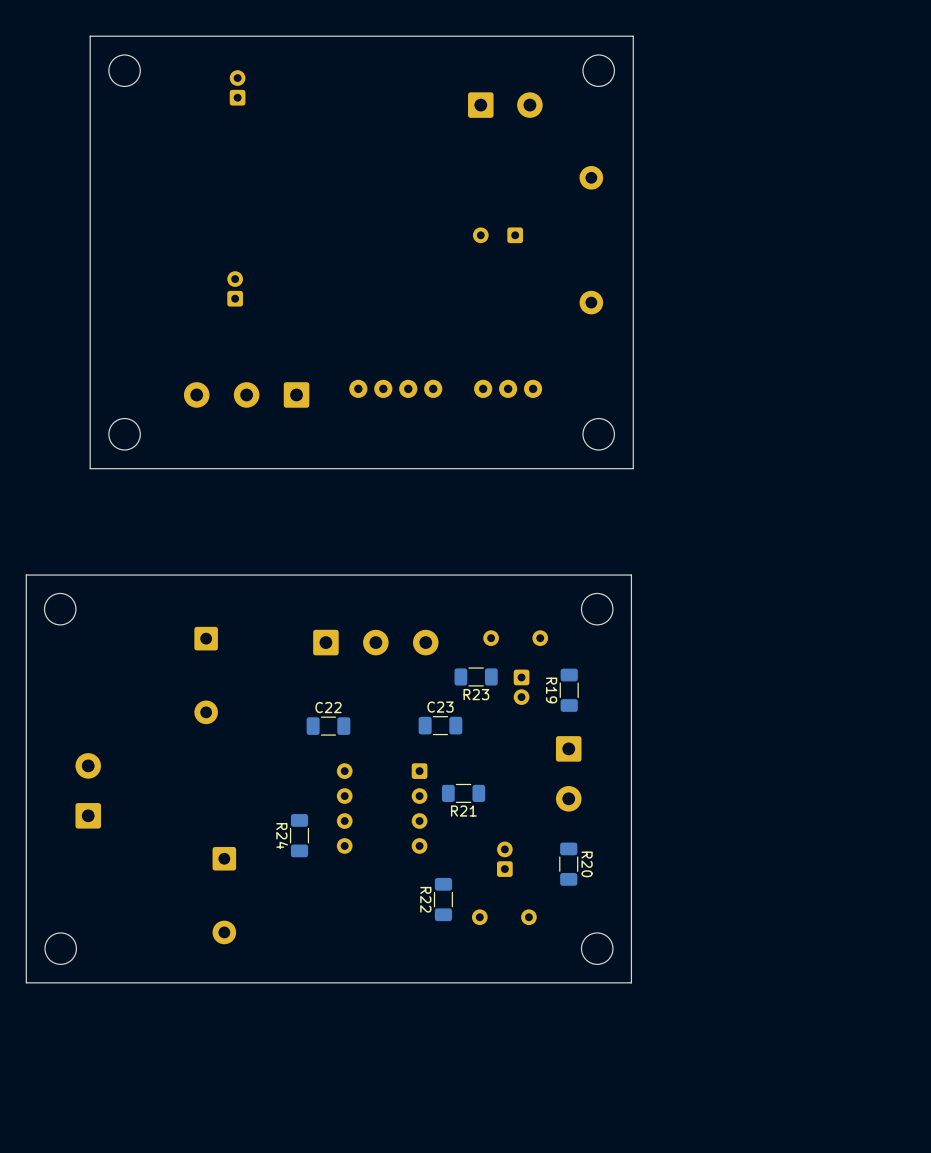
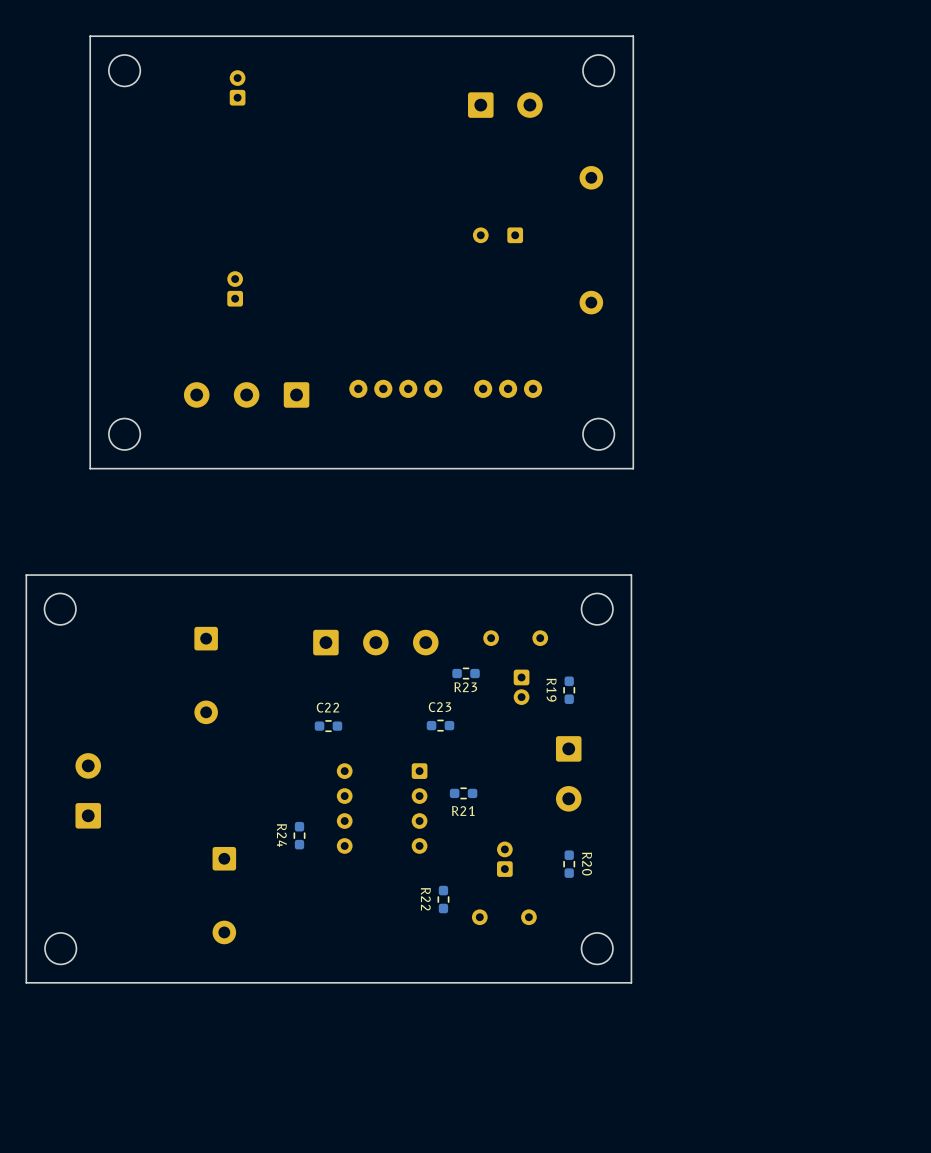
R23 footprint: [454, 667, 498, 687] -> [452, 667, 480, 680]
R19 footprint: [559, 668, 579, 712] -> [563, 676, 575, 704]
C22 footprint: [306, 716, 351, 736] -> [314, 720, 343, 732]
C23 footprint: [418, 716, 463, 736] -> [426, 719, 455, 732]
R21 footprint: [441, 783, 486, 803] -> [449, 787, 478, 800]
R24 footprint: [289, 814, 310, 858] -> [293, 821, 306, 850]
R20 footprint: [559, 842, 579, 886] -> [563, 850, 575, 878]
R22 footprint: [433, 877, 453, 922] -> [437, 885, 450, 914]

